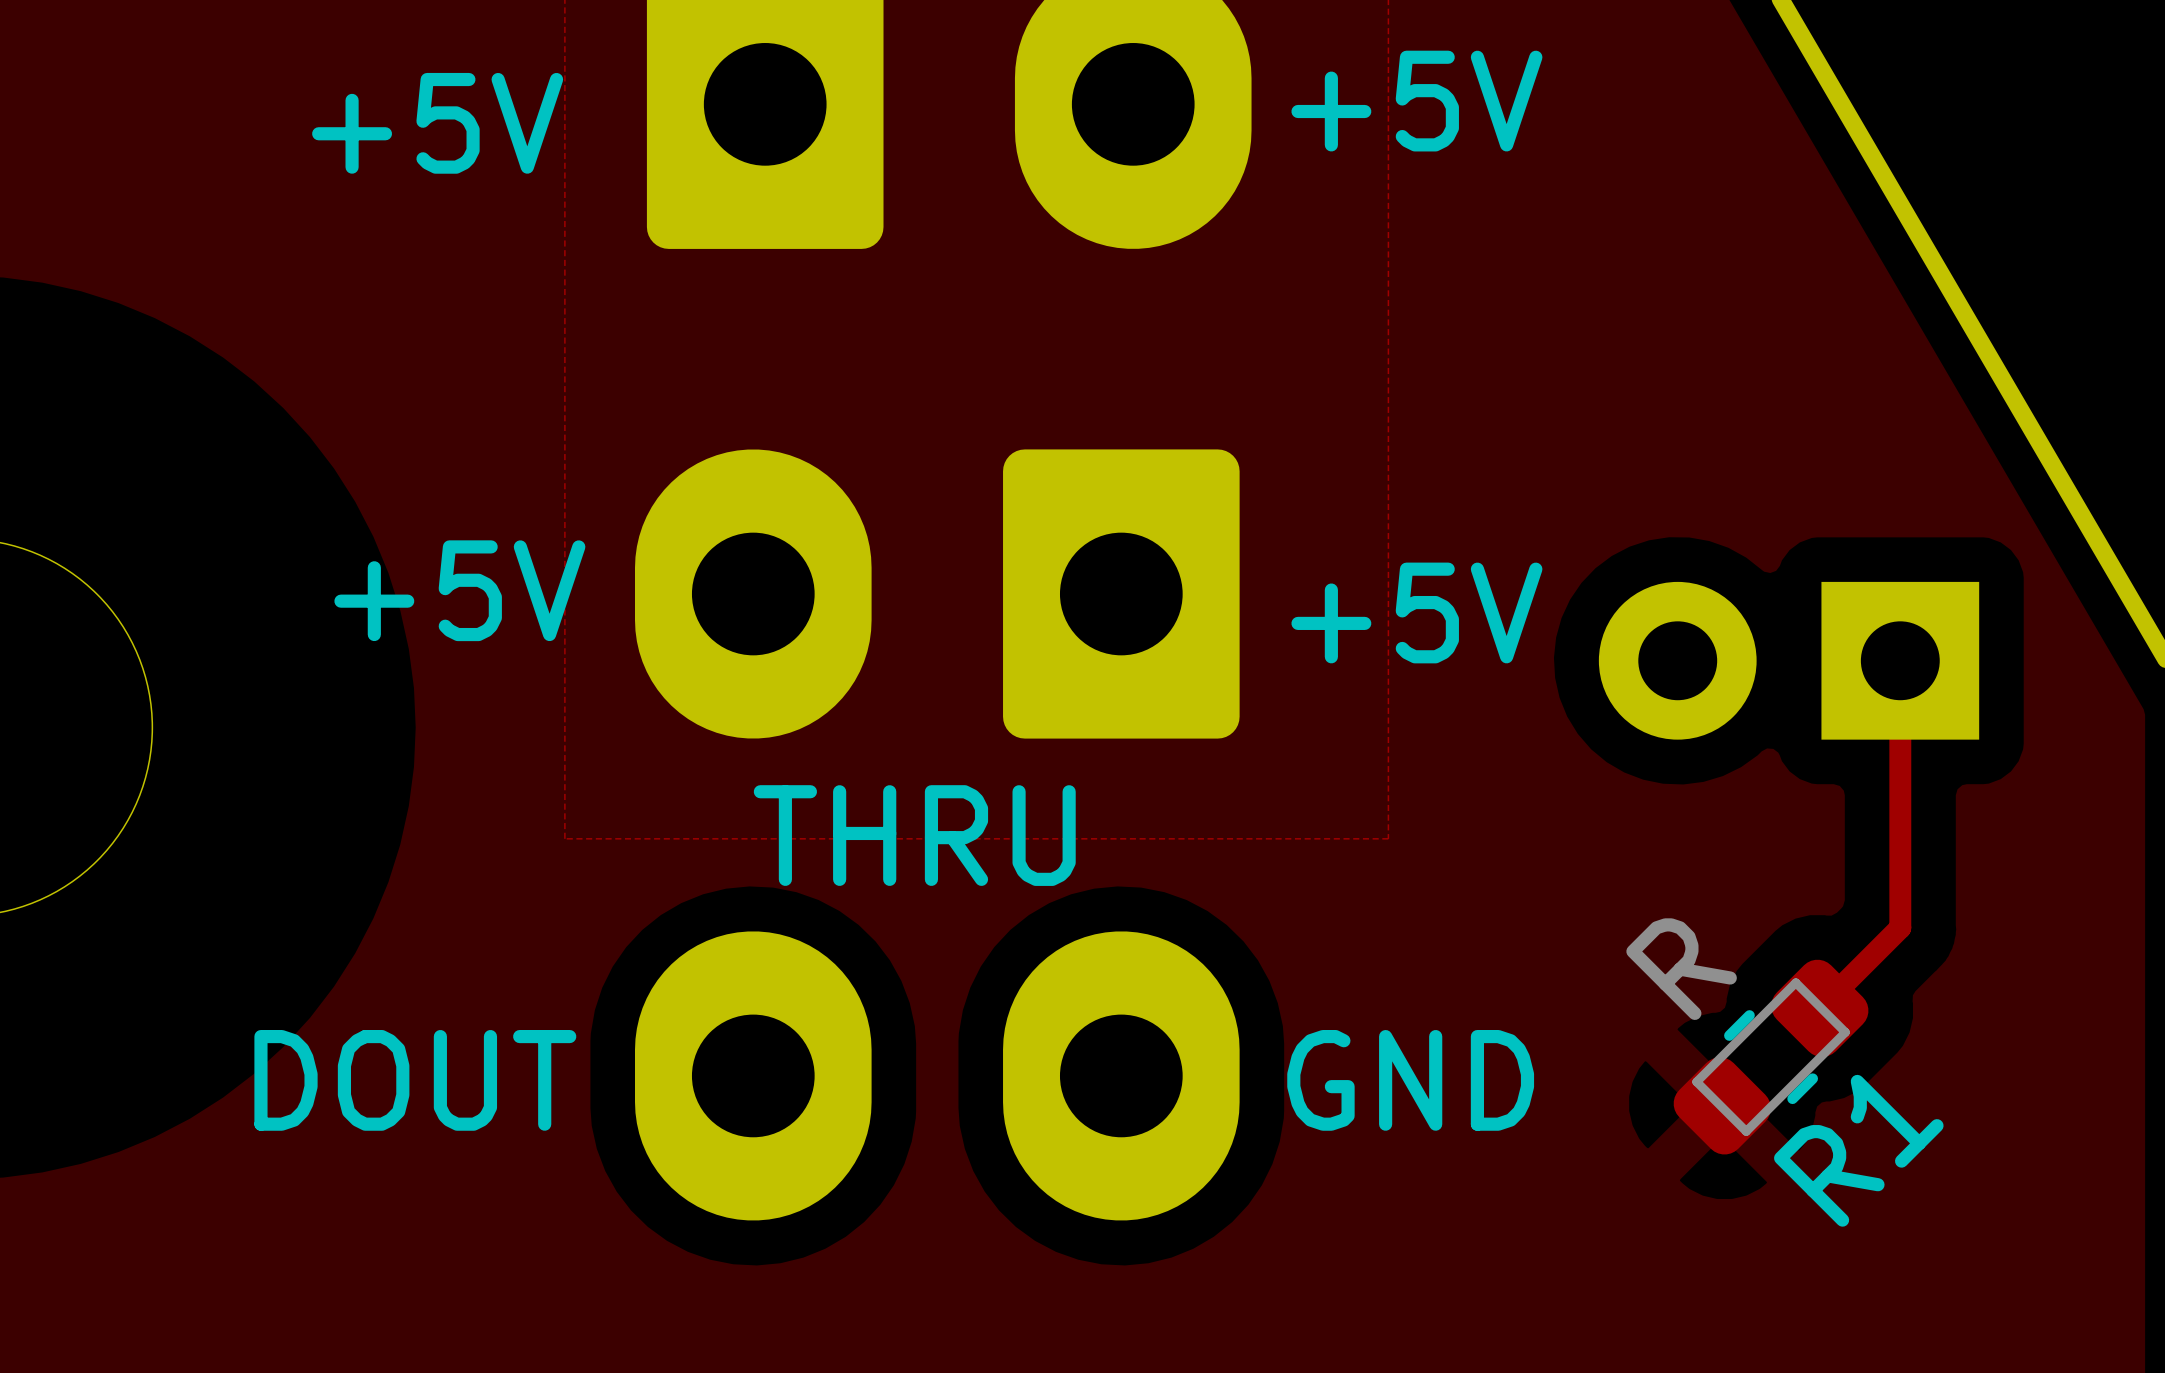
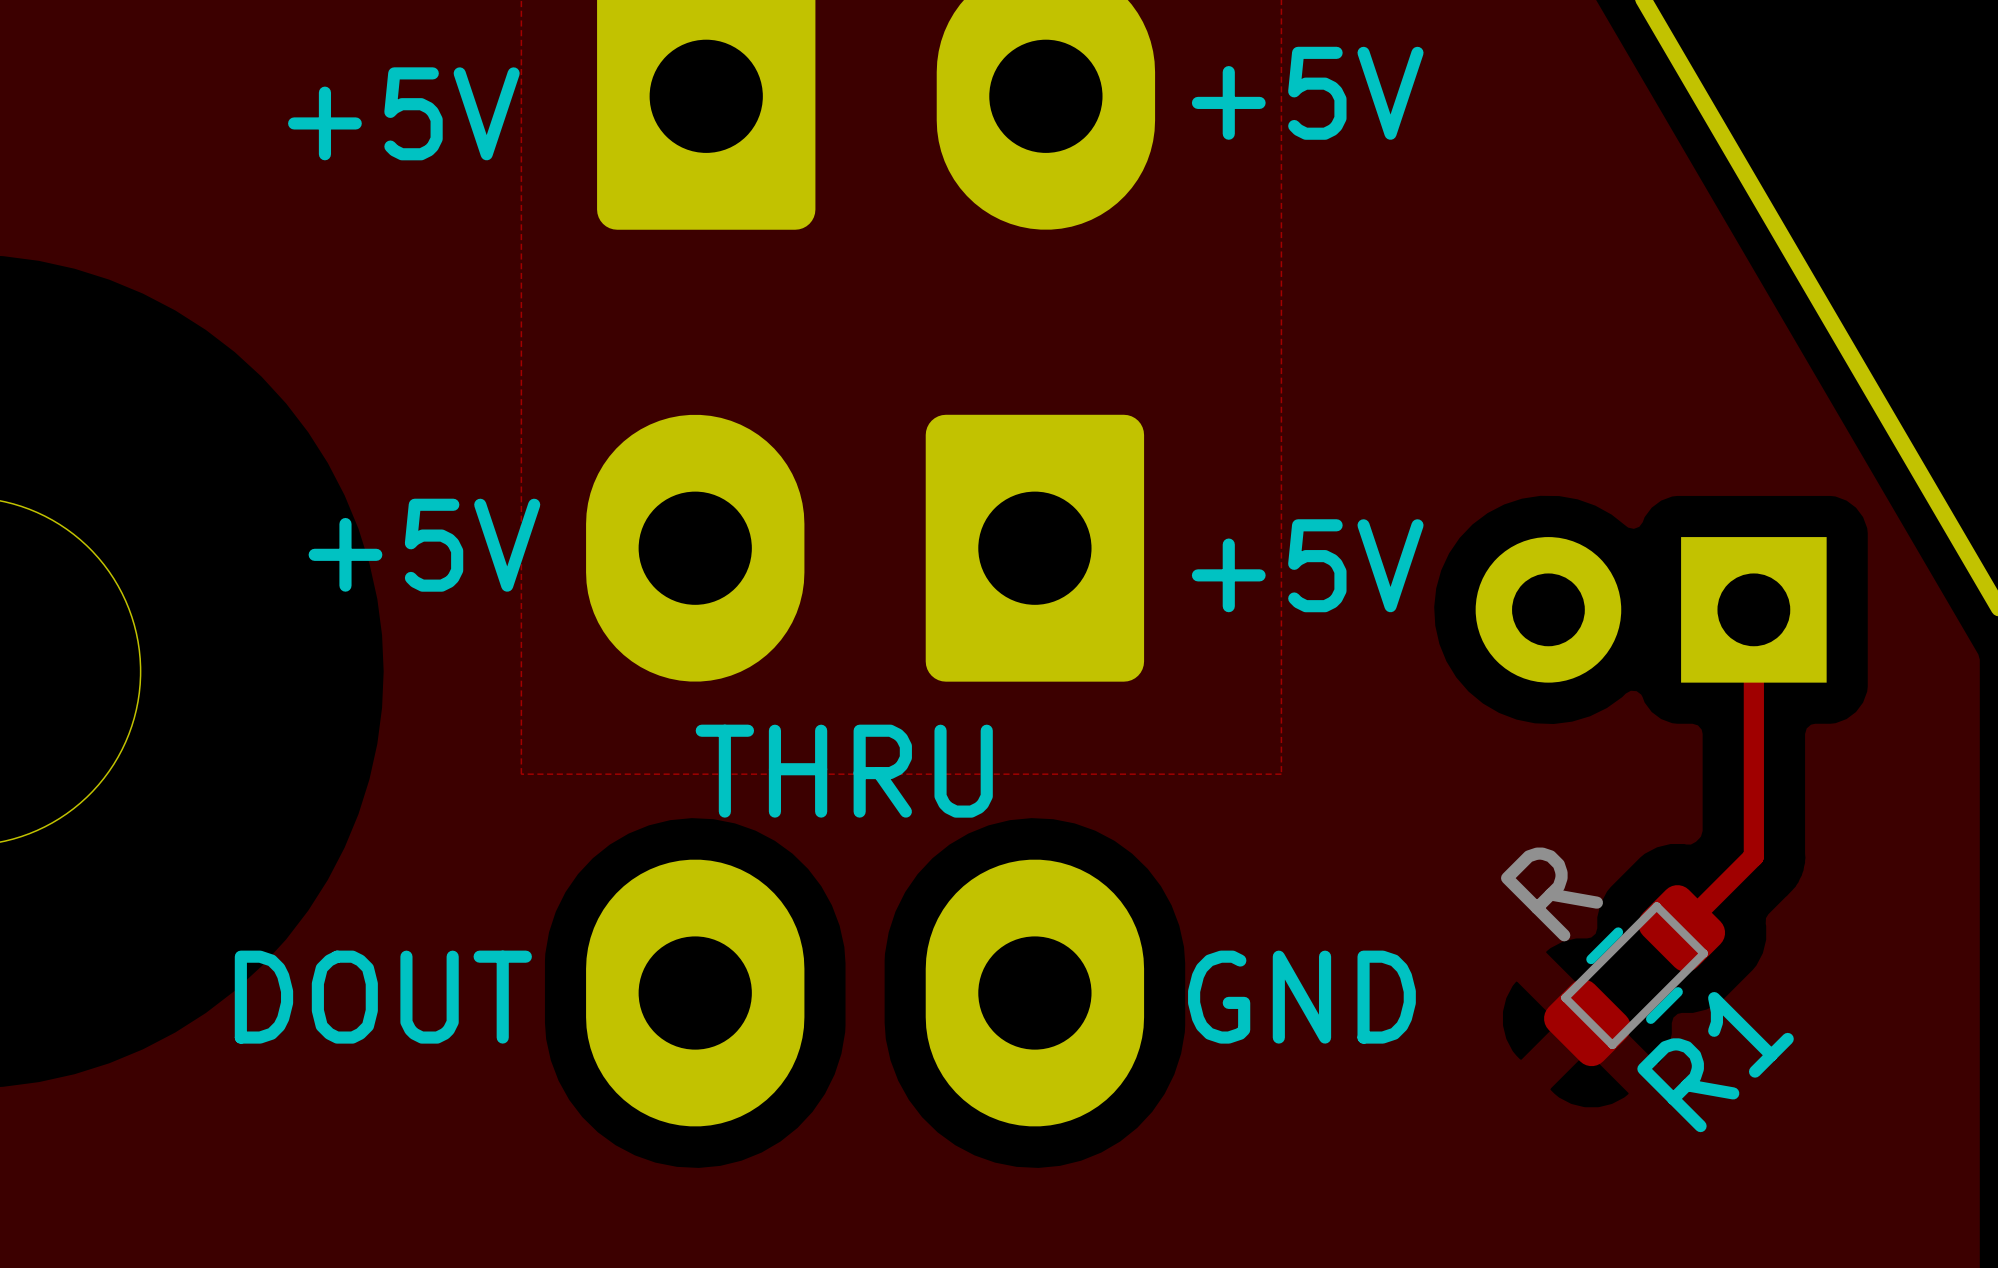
R1 footprint: [1673, 959, 1869, 1155] -> [1544, 885, 1726, 1067]

